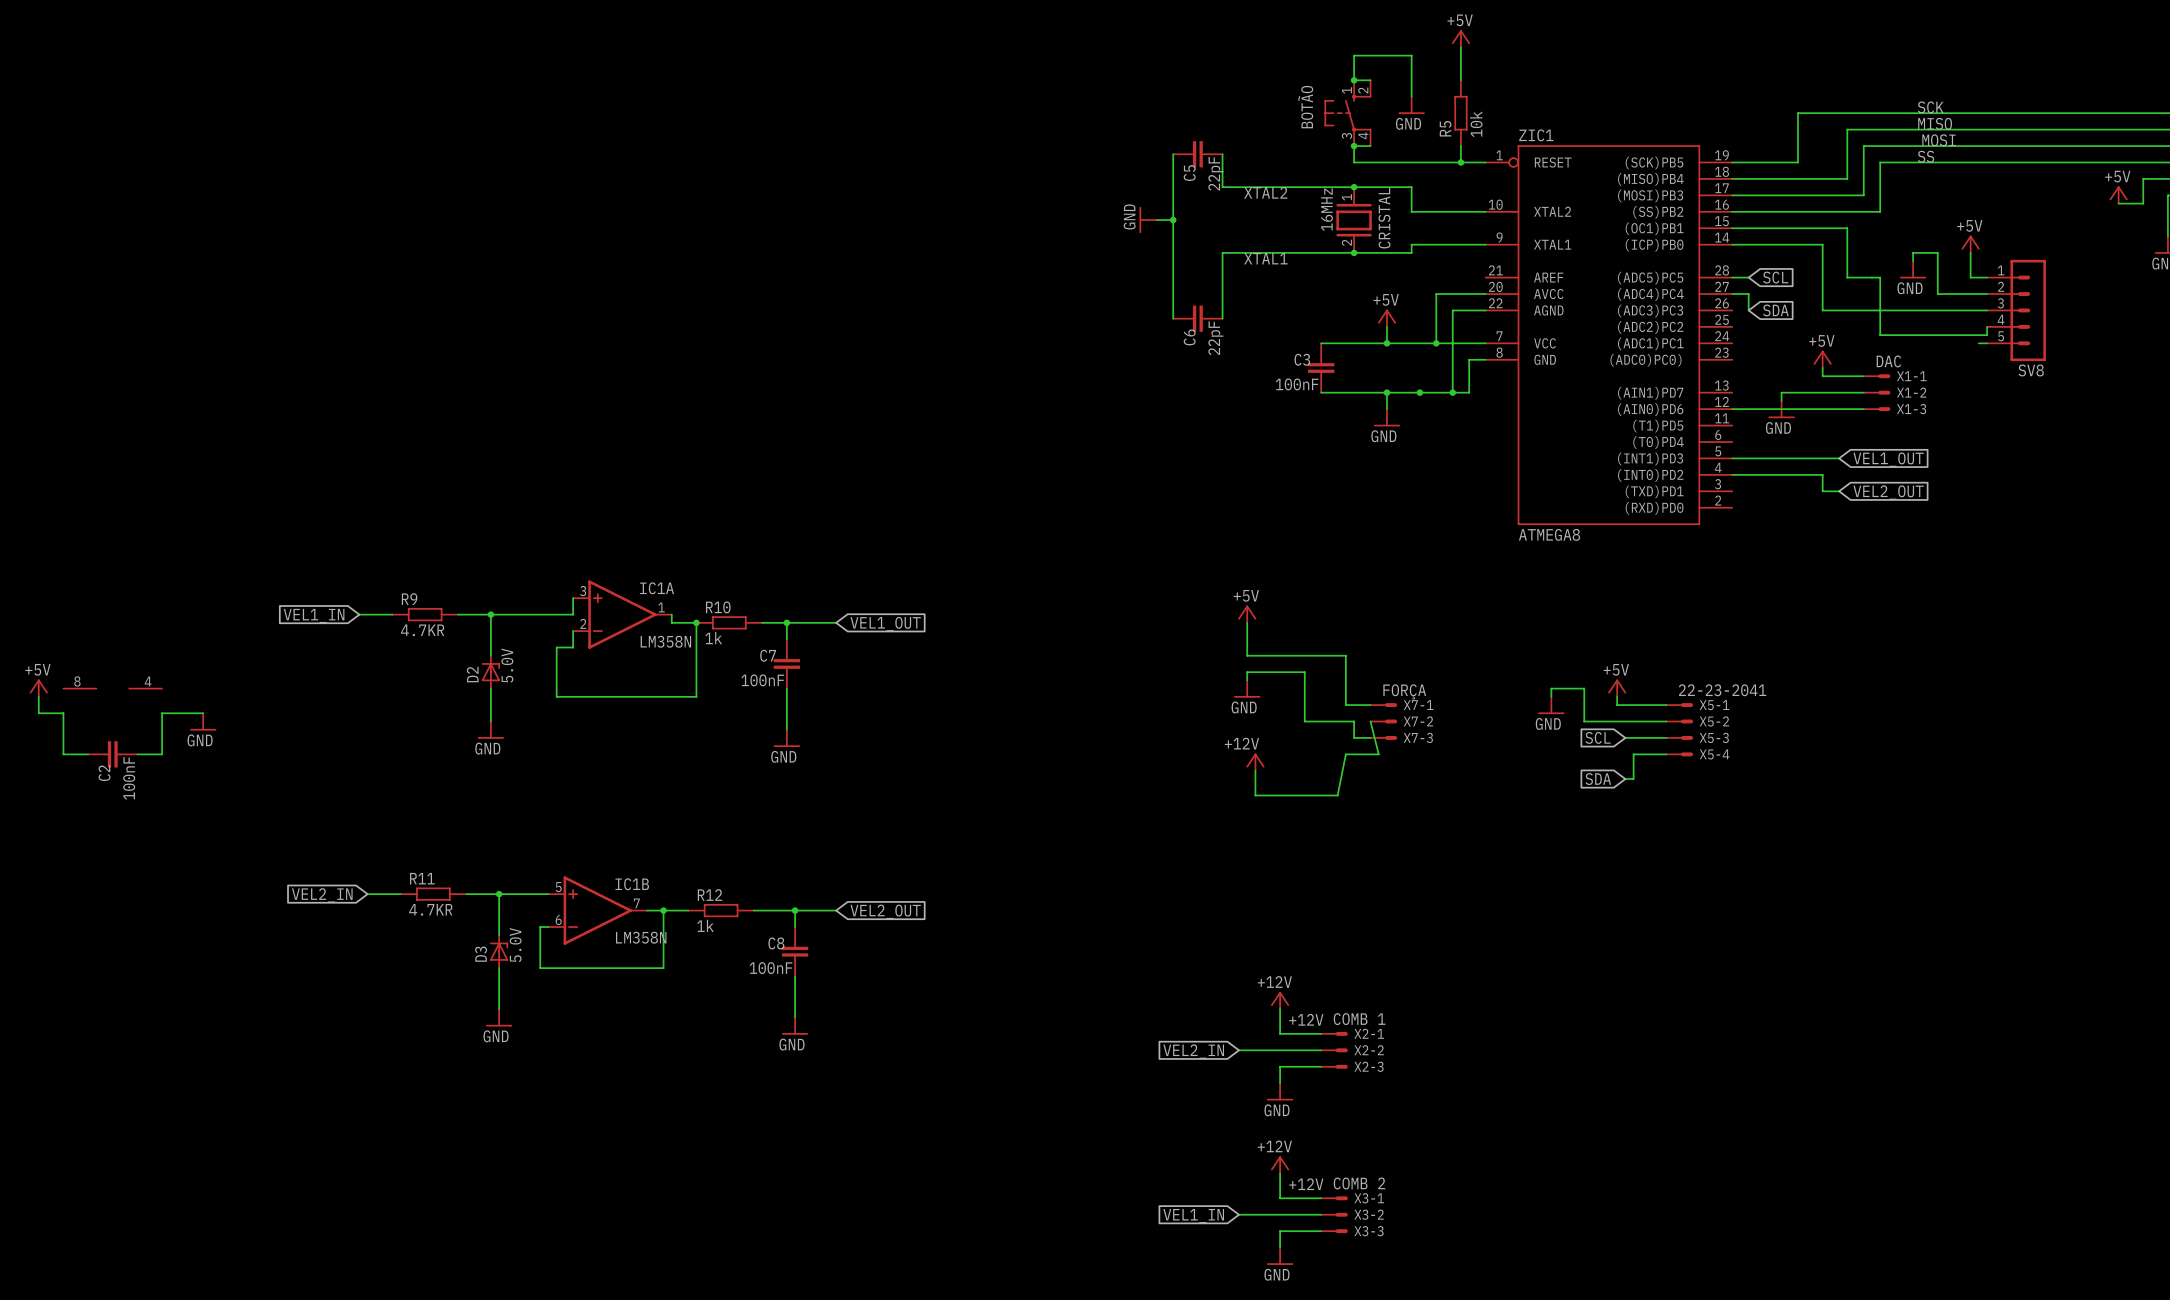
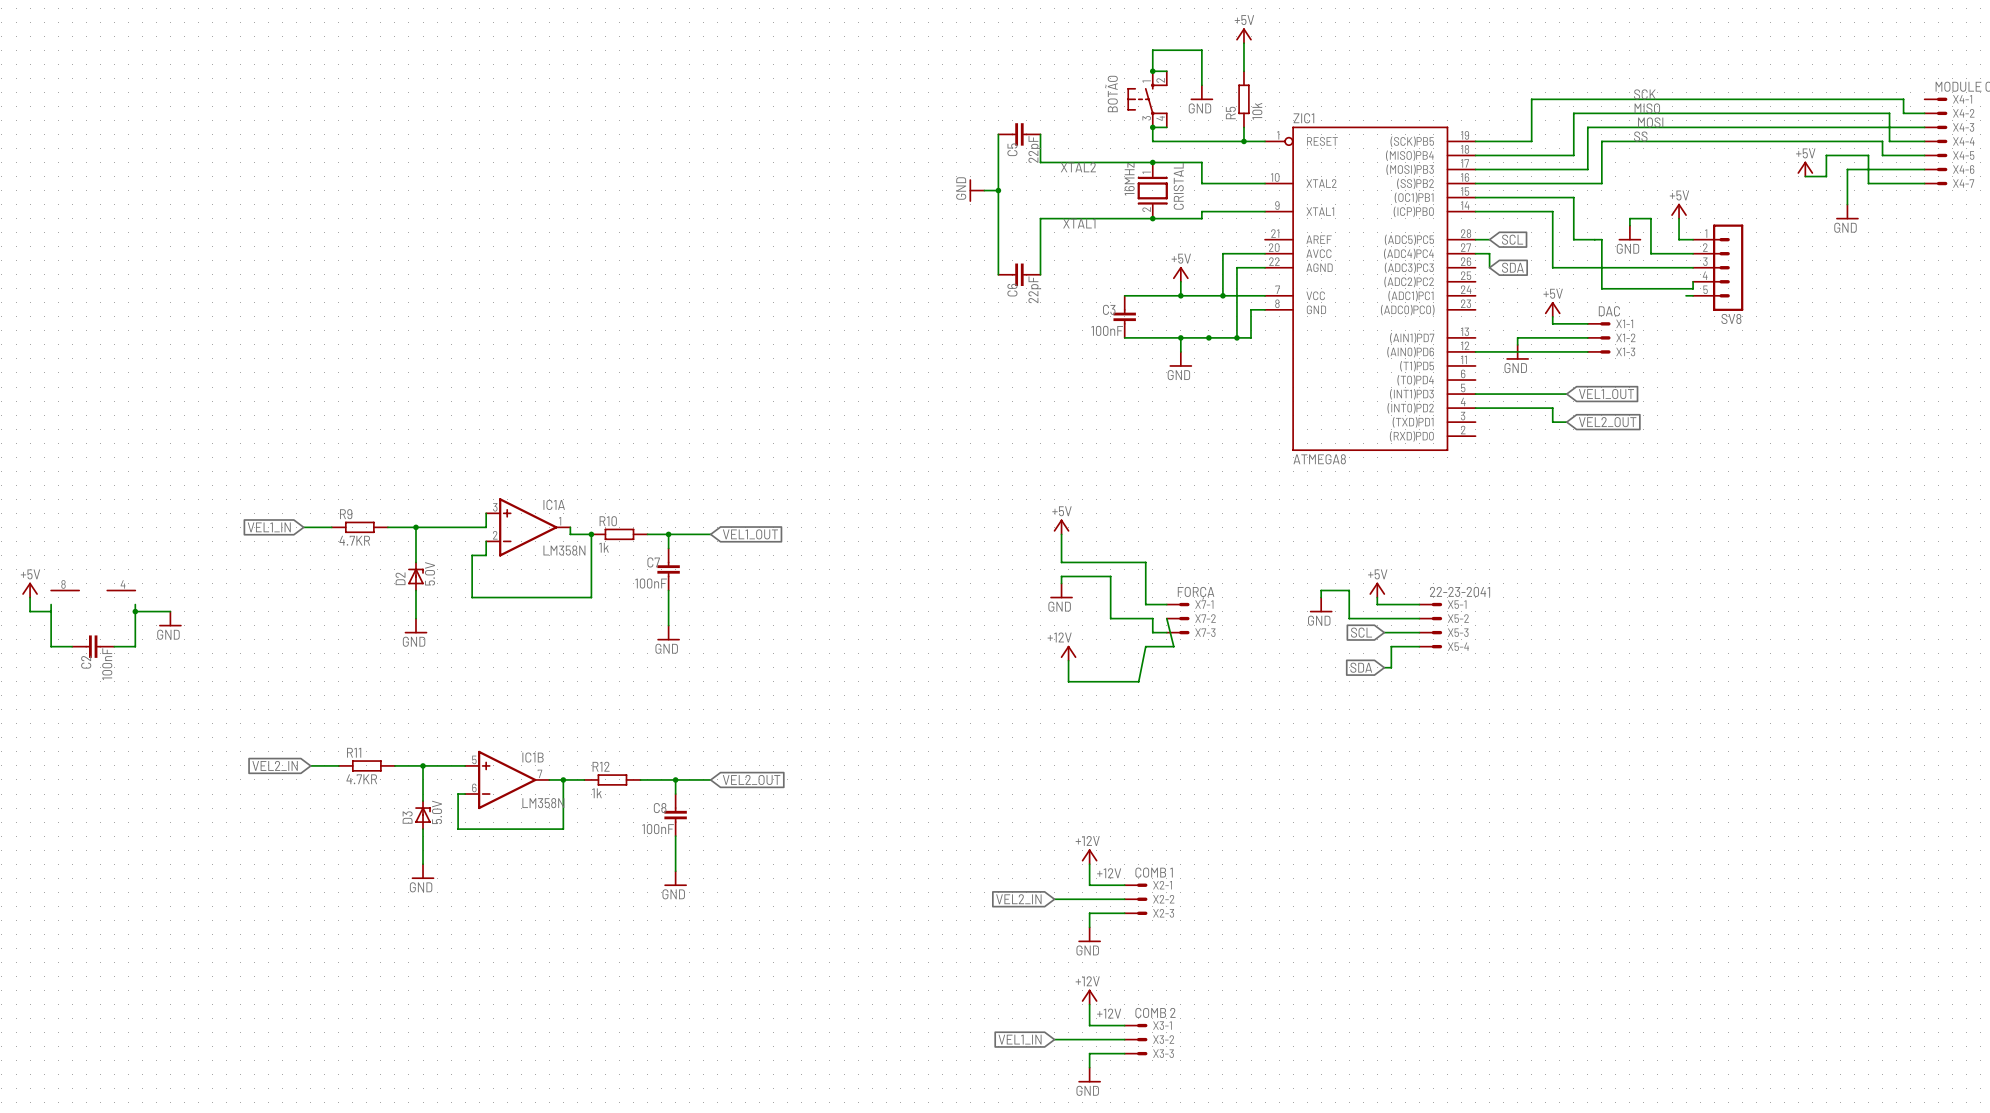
wire: none -> (51, 604) (51, 611)
wire: none -> (135, 604) (135, 611)
junction: none -> (135, 611)

